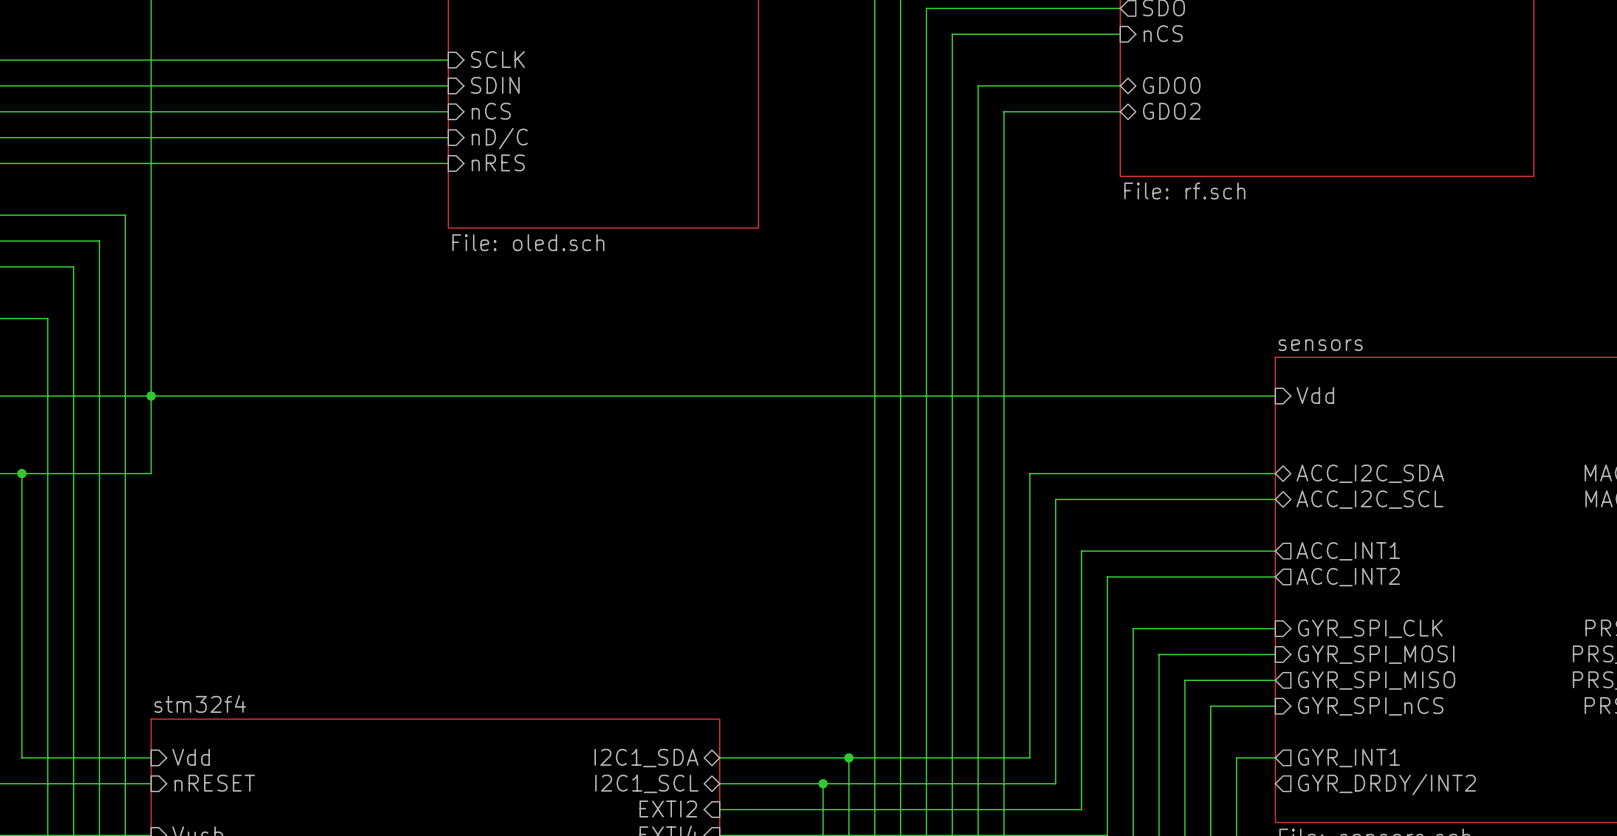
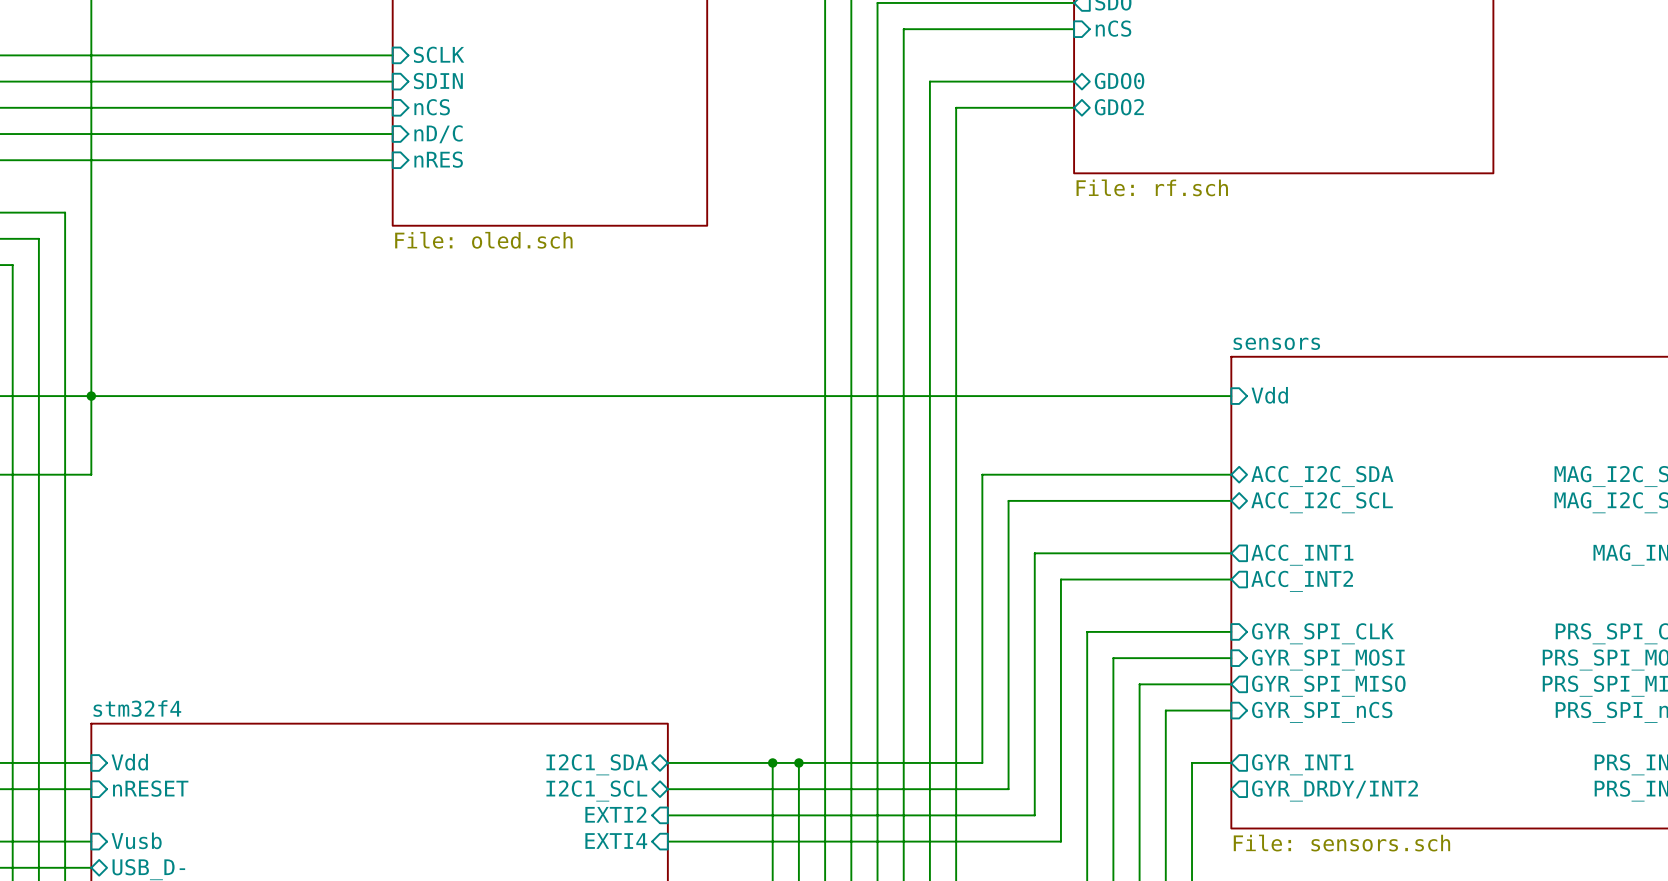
wire: none -> (772, 762) (772, 789)
junction position: (823, 783) -> (772, 762)

